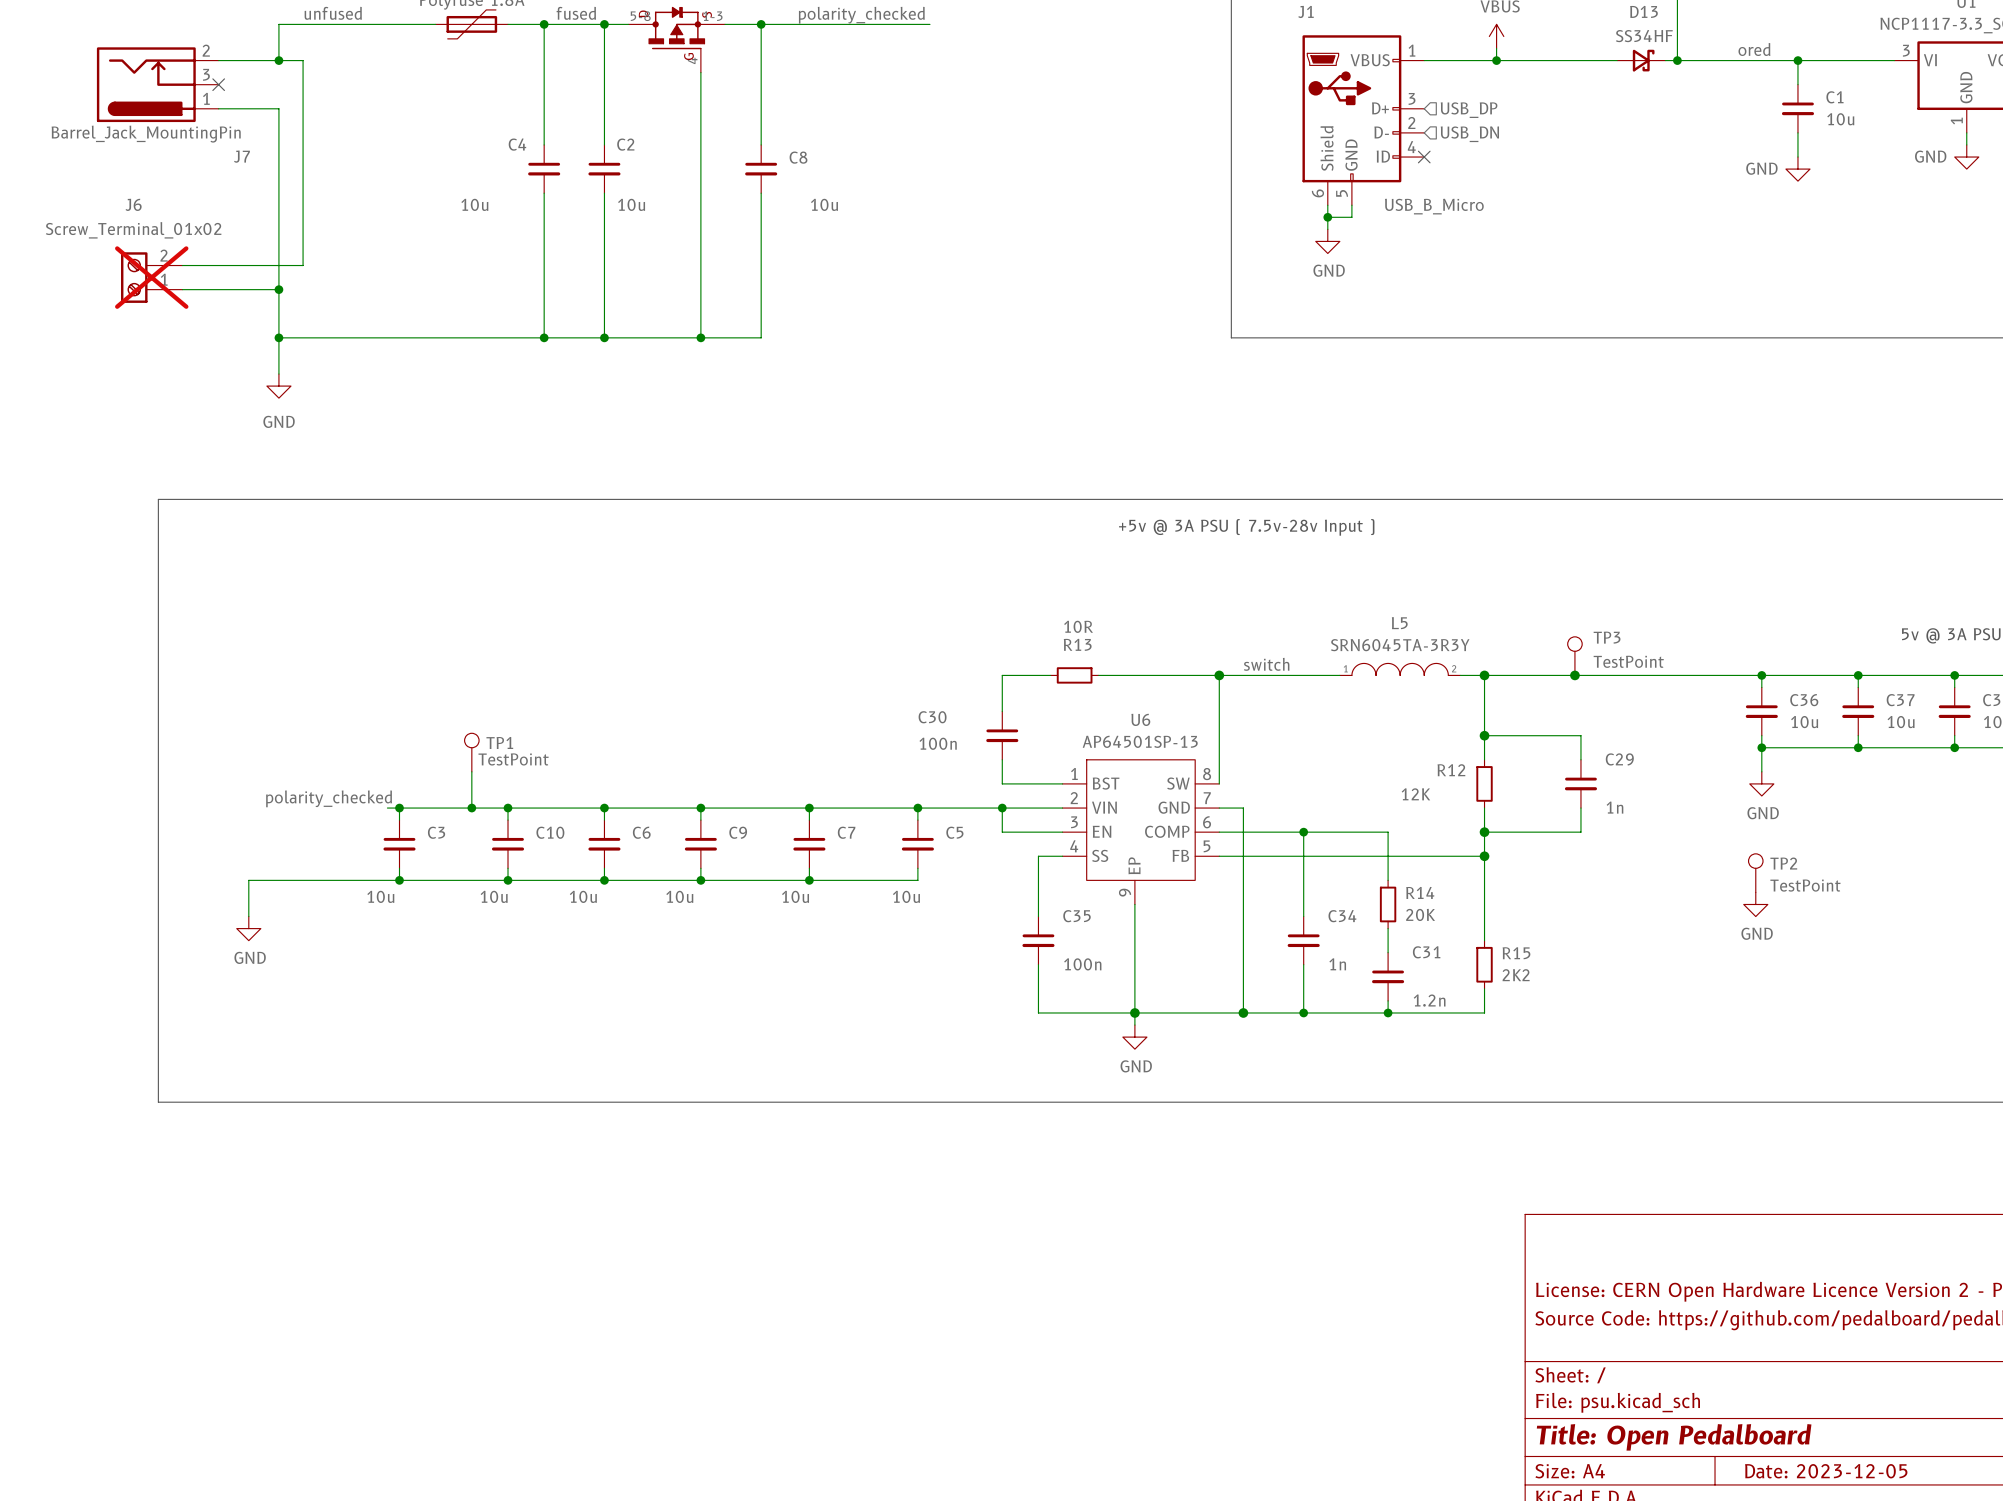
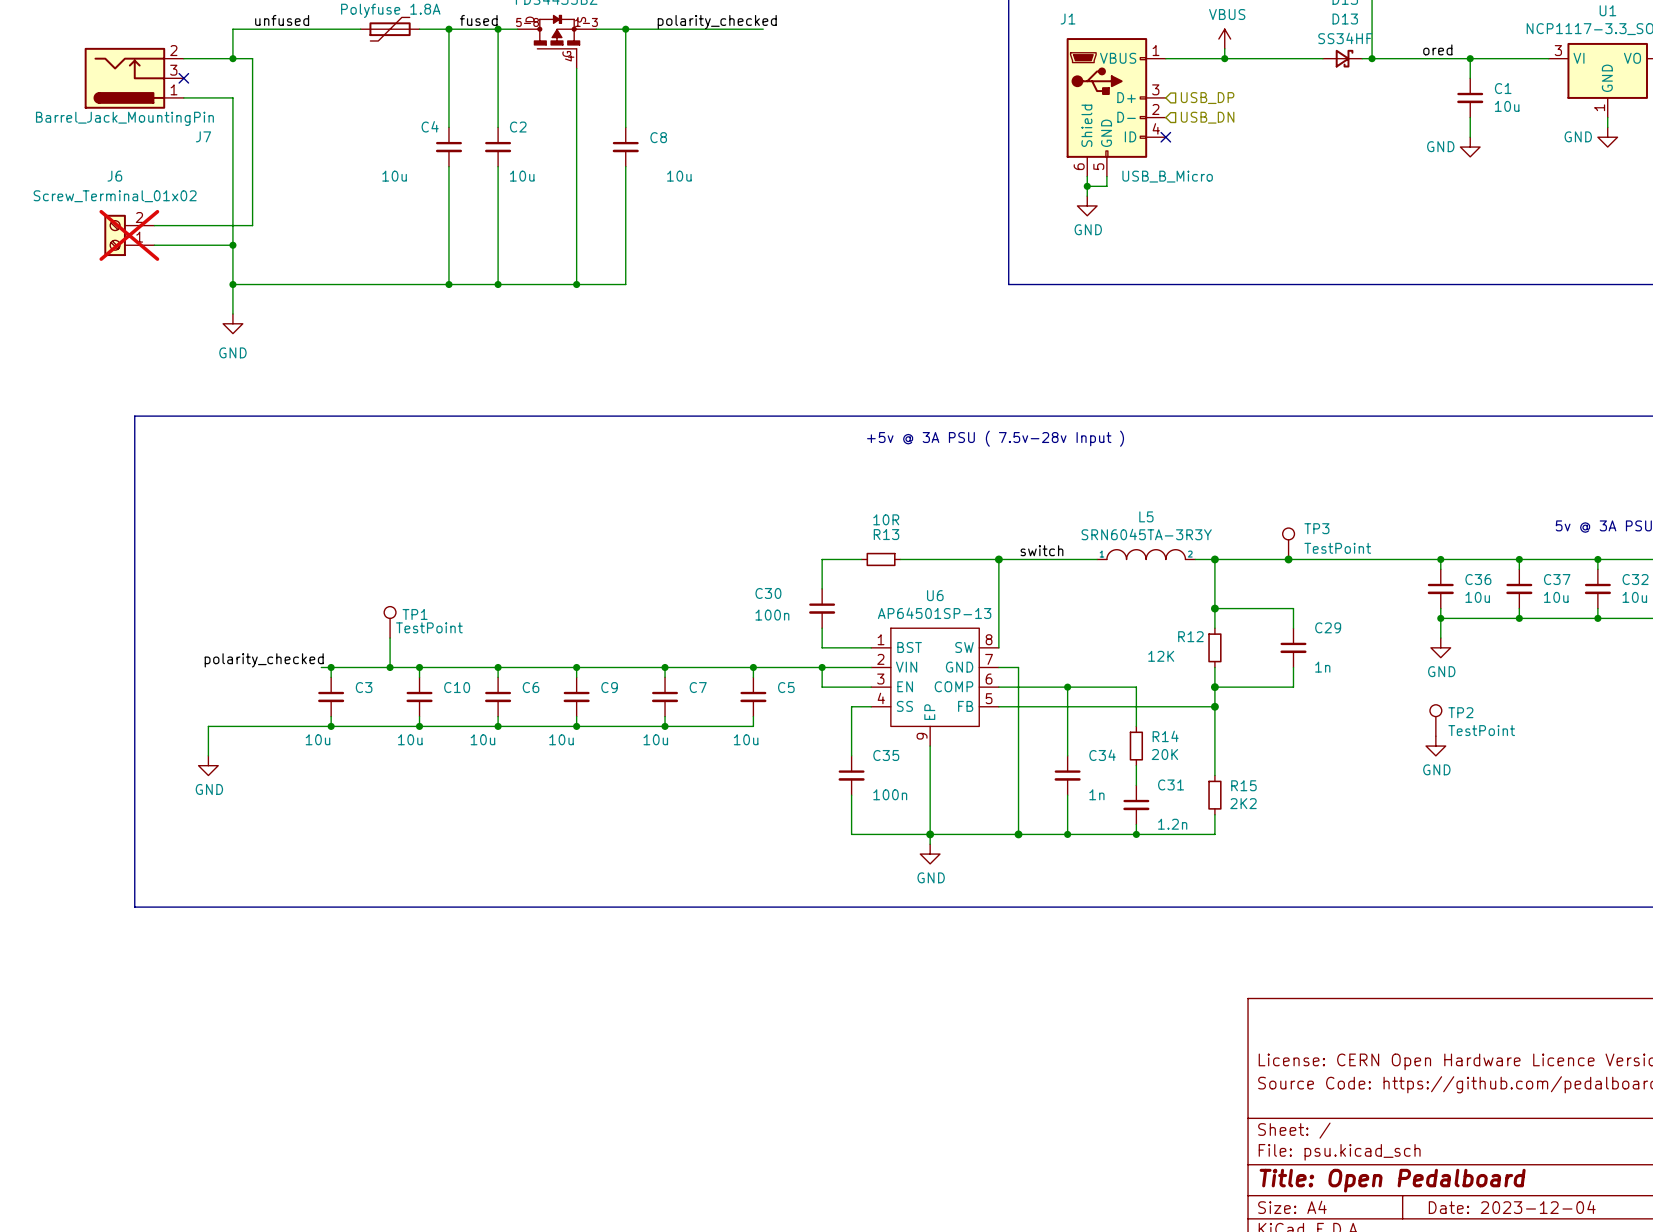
title block: Date: 2023-12-05 (1826, 1471) -> Date: 2023-12-04 (1512, 1207)

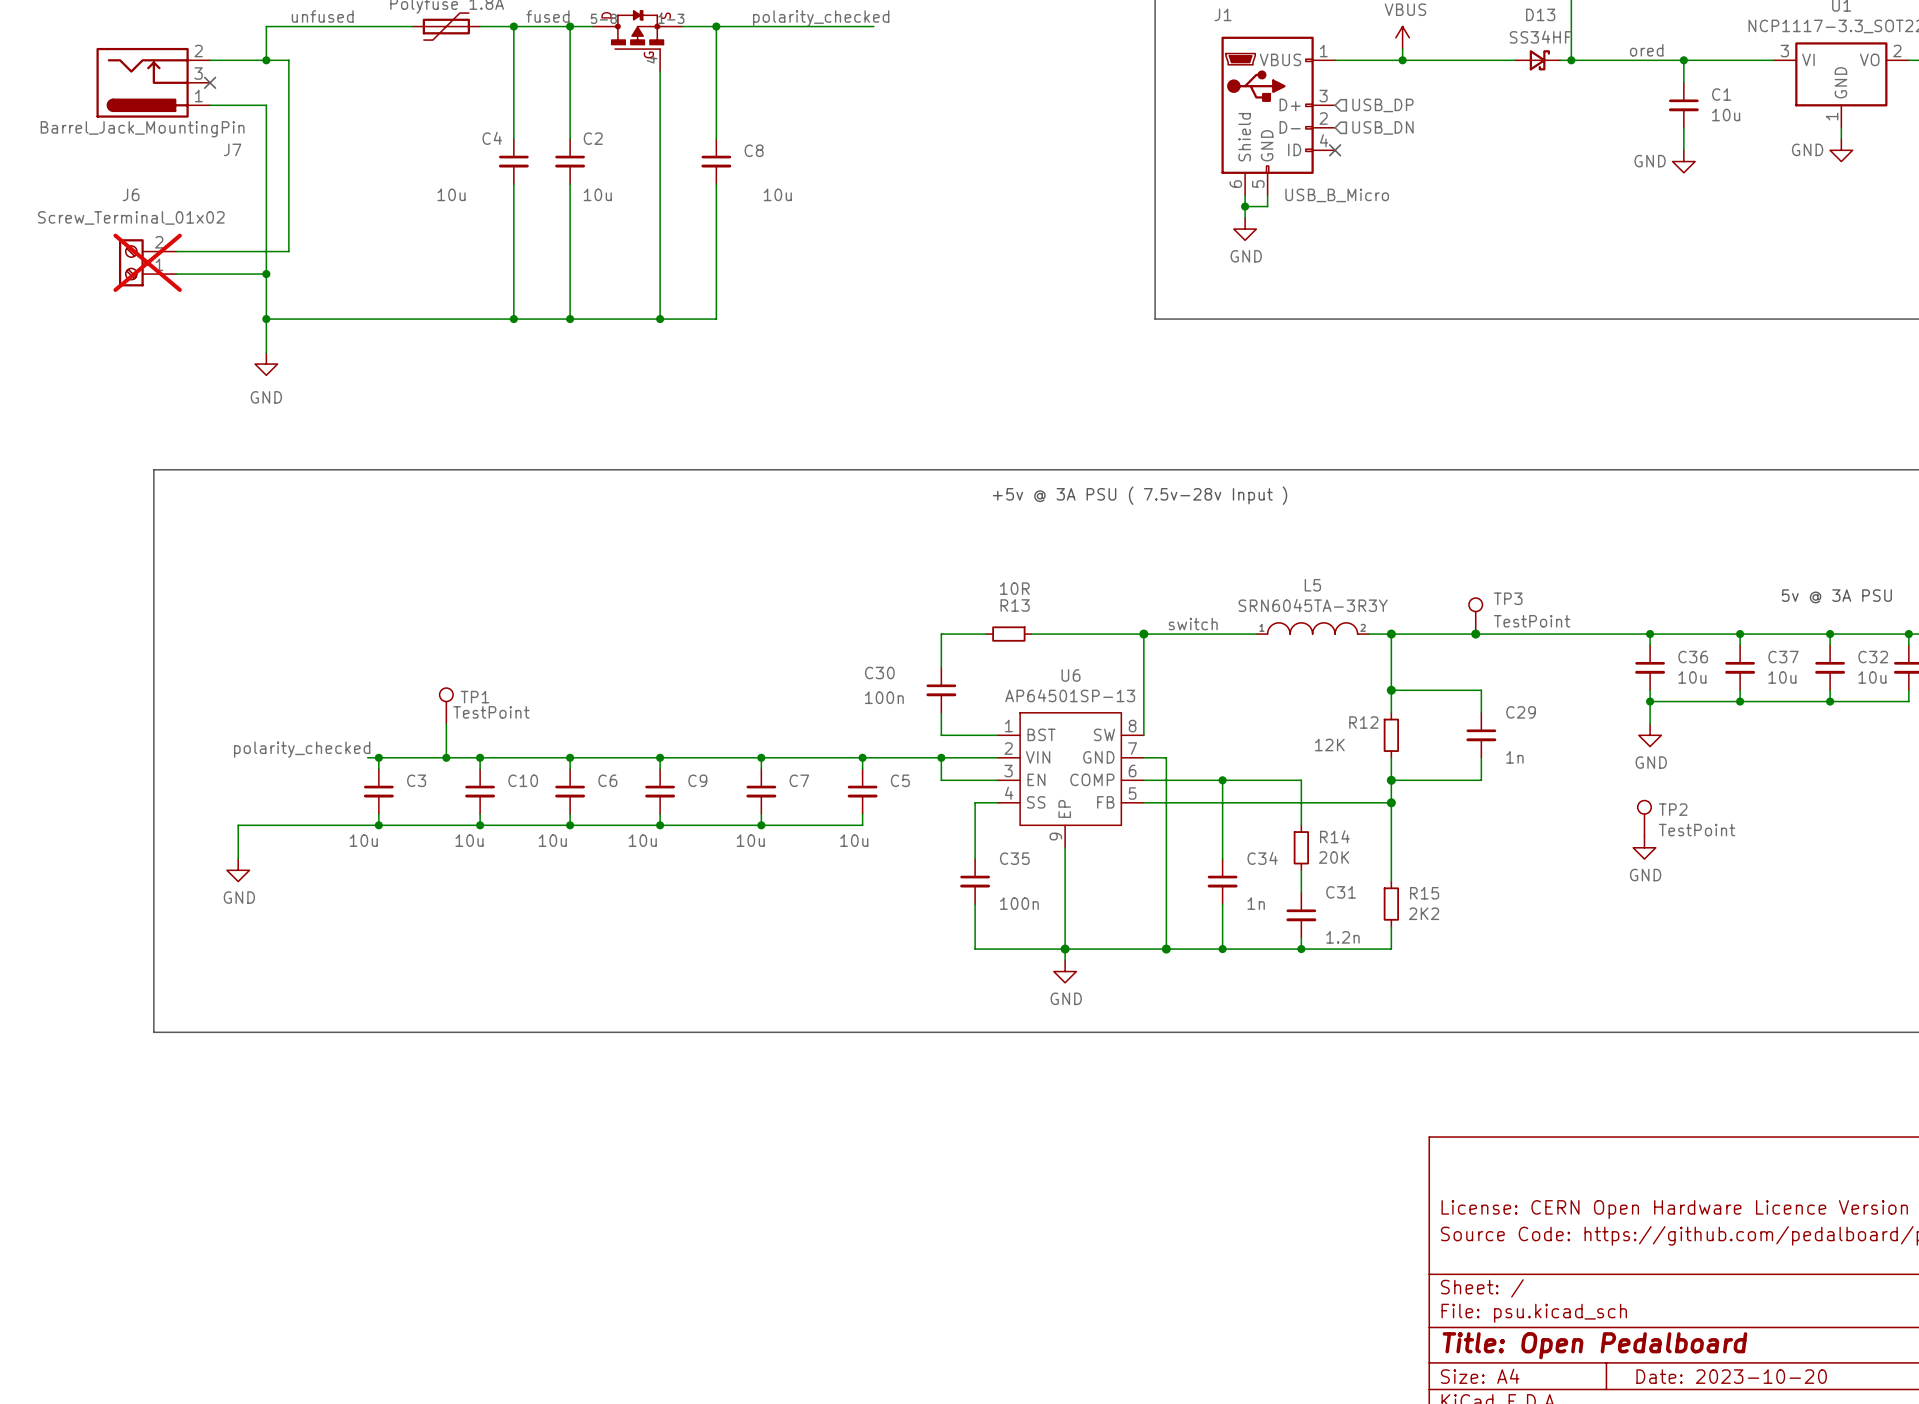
title block: Date: 2023-12-04 (1512, 1207) -> Date: 2023-10-20 (1731, 1376)

